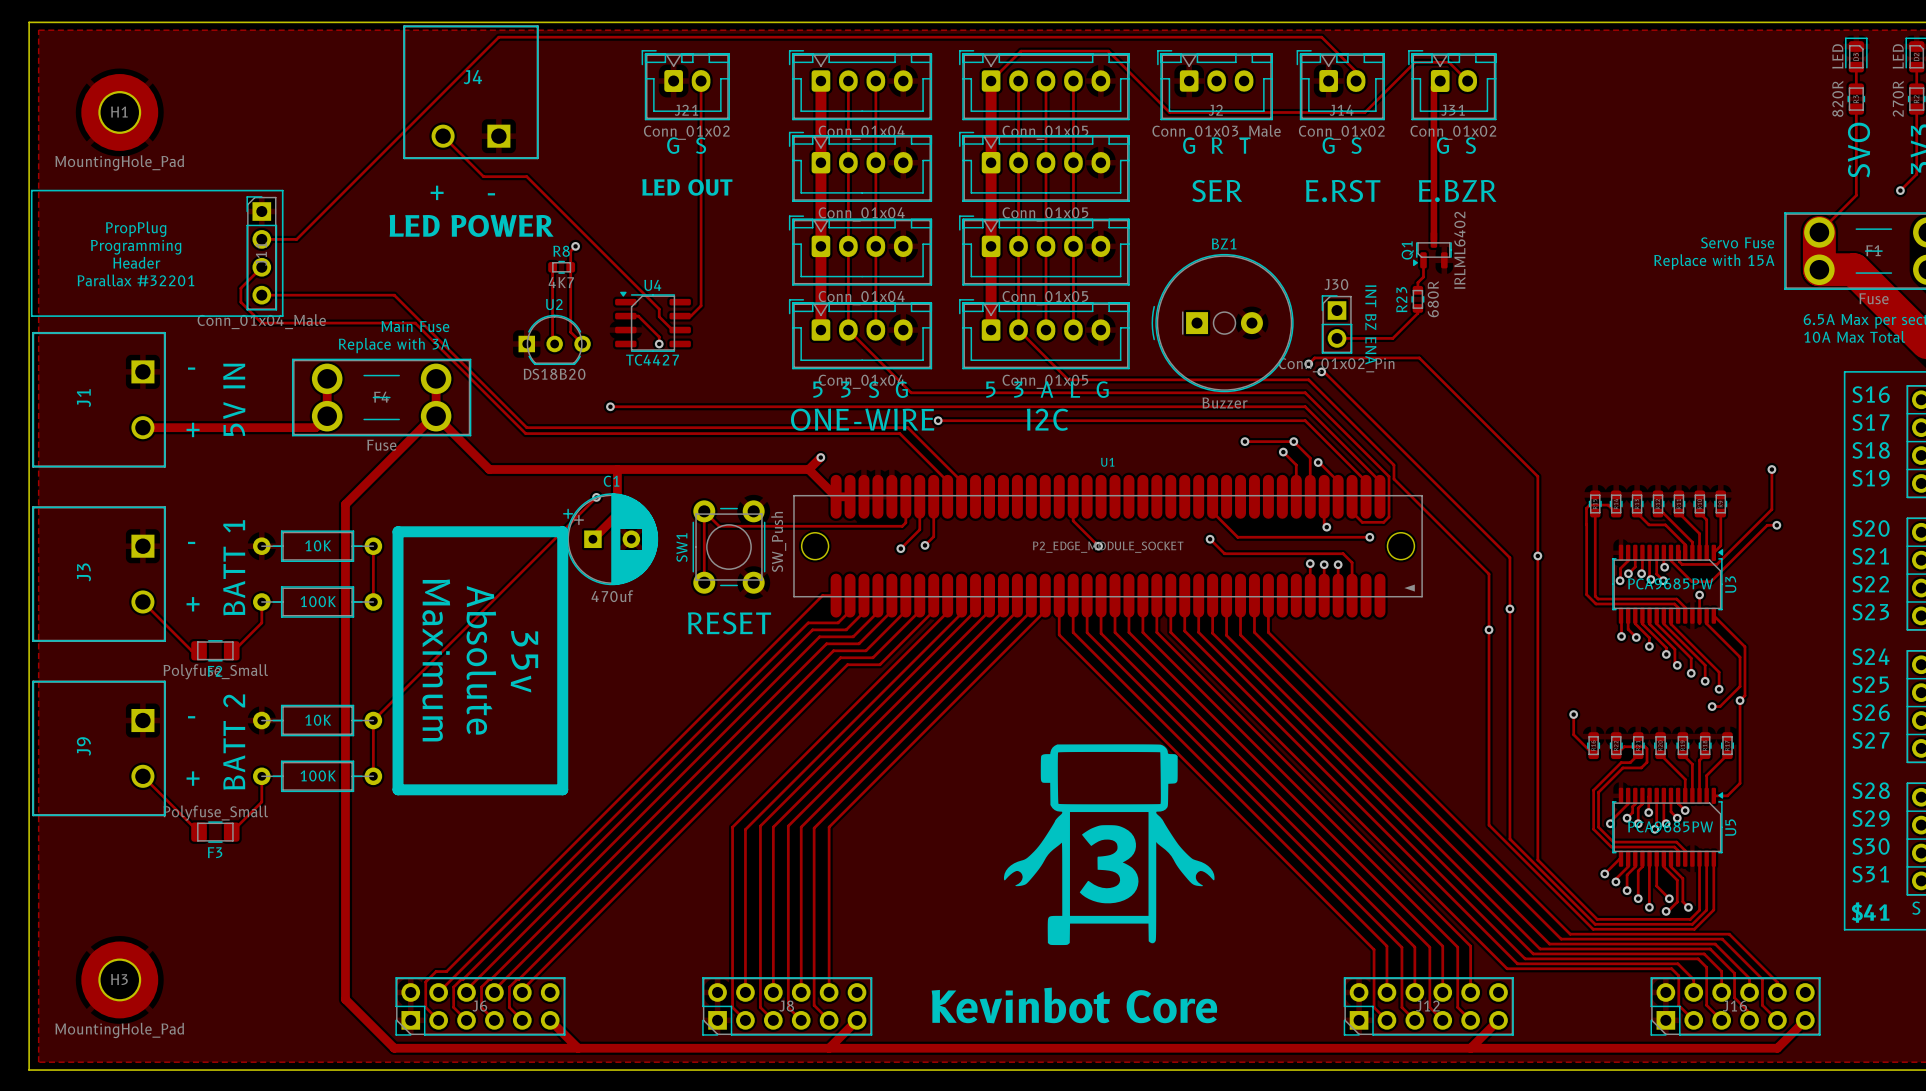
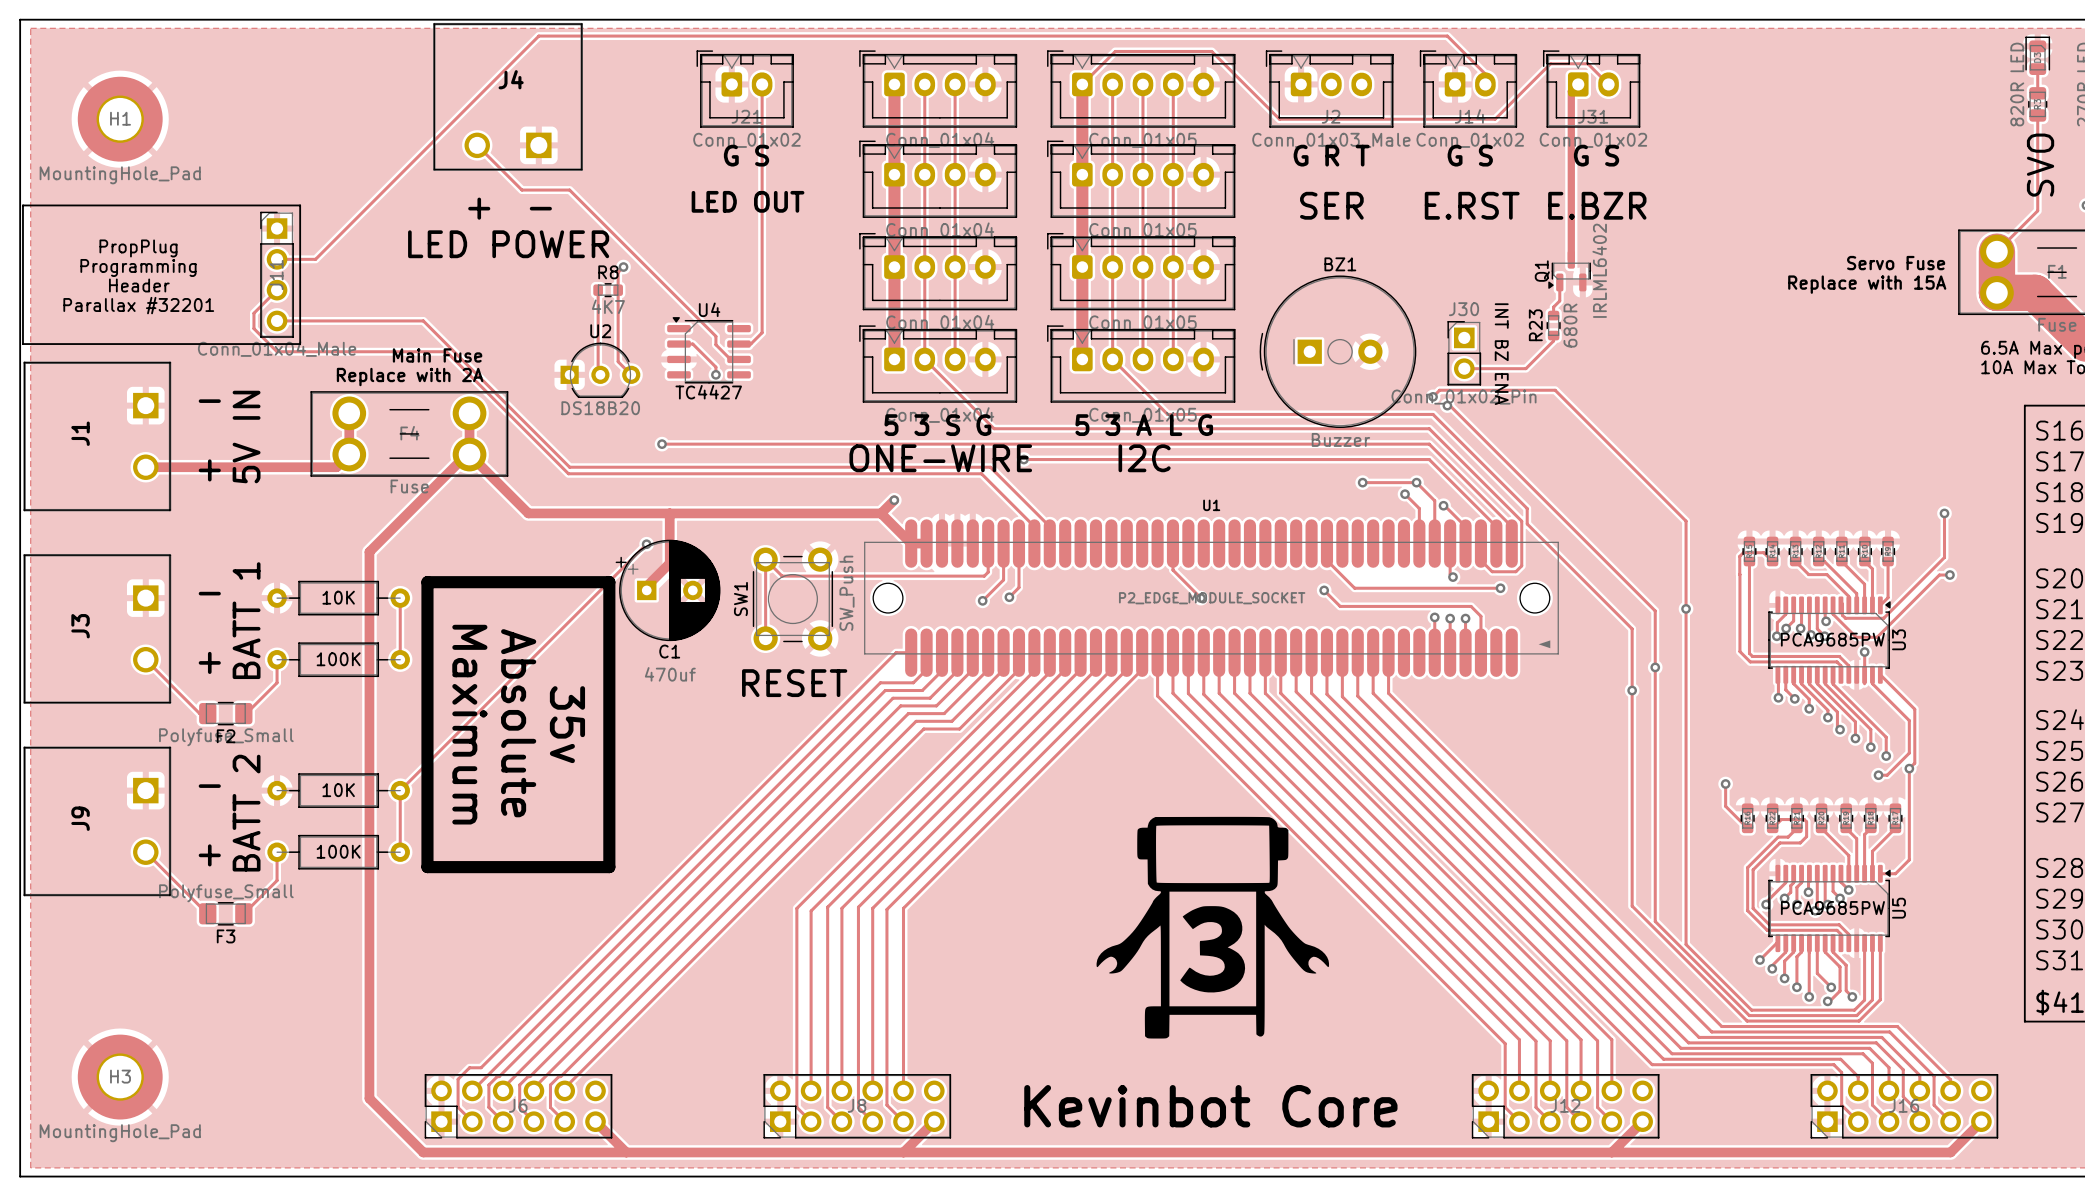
text: Replace with 3A (394, 345) -> Replace with 2A (410, 377)
C1 name position: C1 (611, 481) -> C1 (669, 651)
C1 footprint: [563, 493, 659, 586] -> [615, 539, 721, 642]
C1 value position: 470uf (612, 596) -> 470uf (670, 674)

